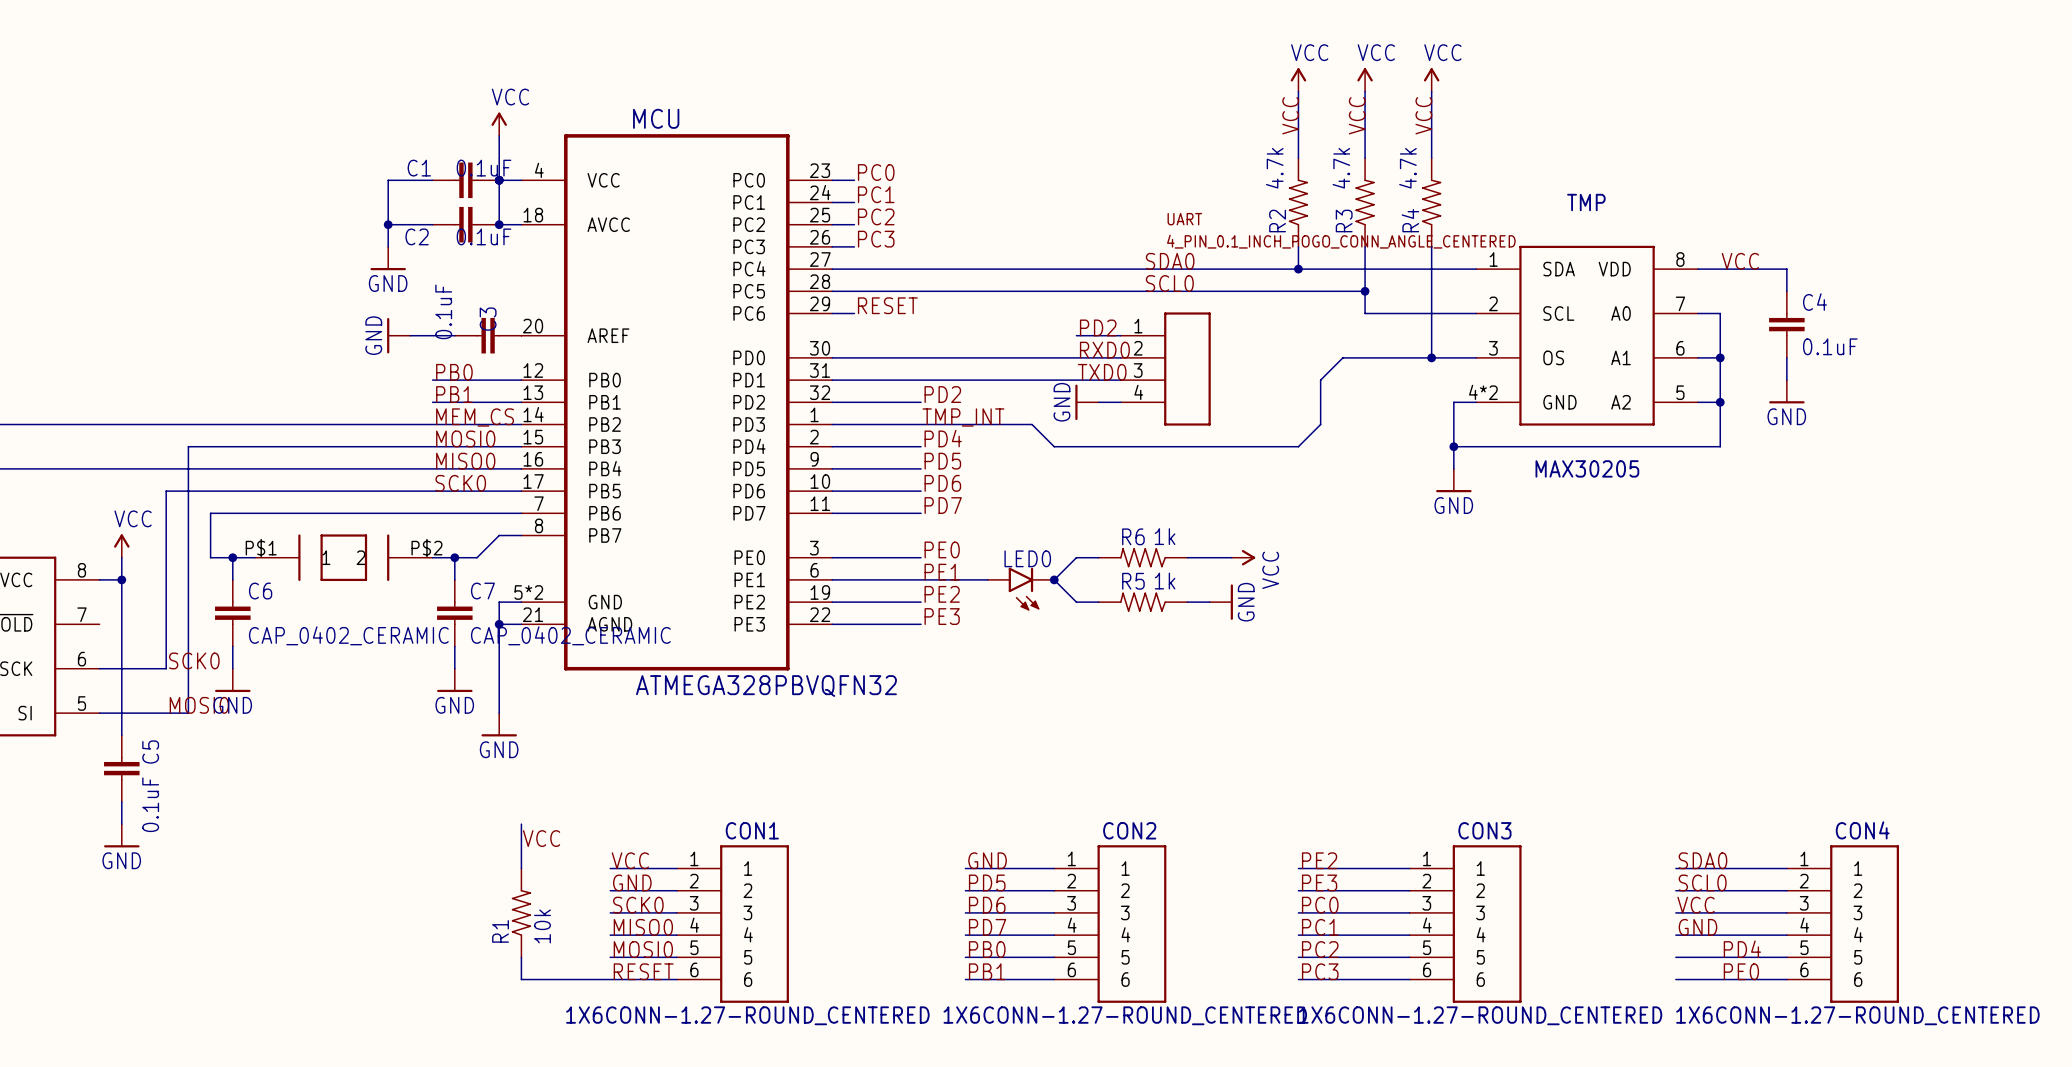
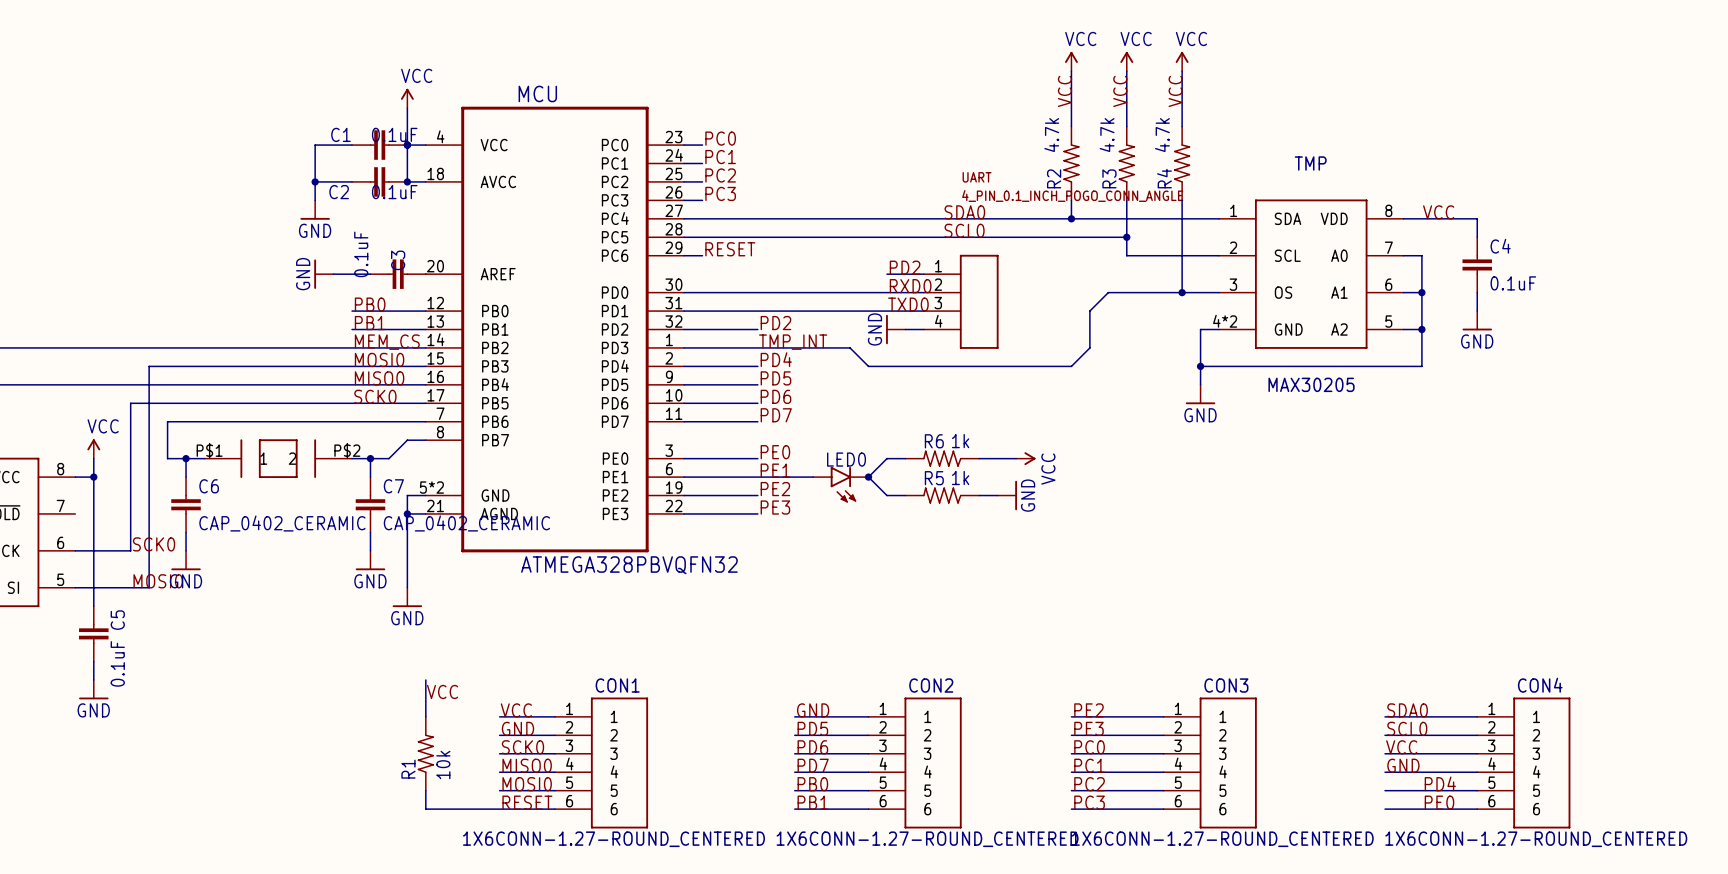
UART value: 4_PIN_0.1_INCH_POGO_CONN_ANGLE_CENTERED (1341, 241) -> 4_PIN_0.1_INCH_POGO_CONN_ANGLE (1072, 196)

